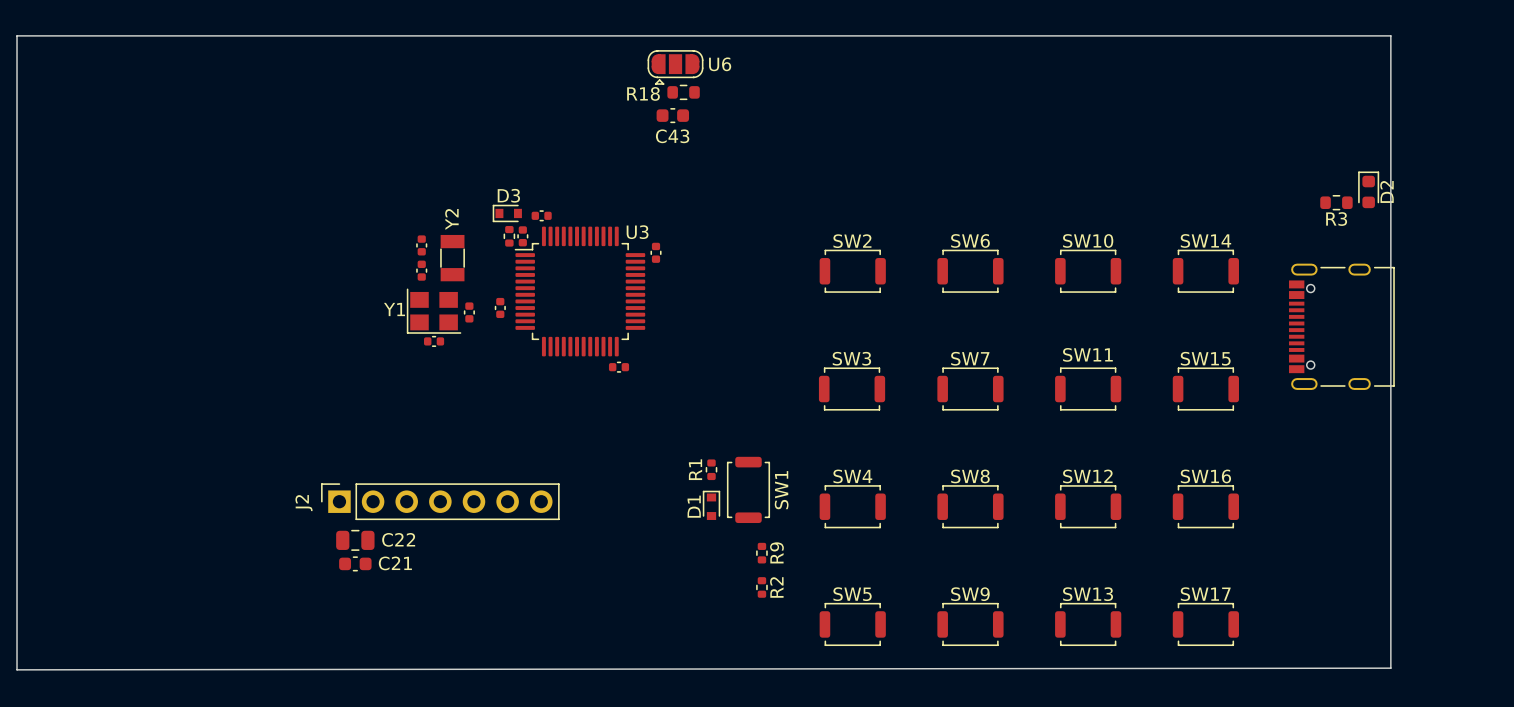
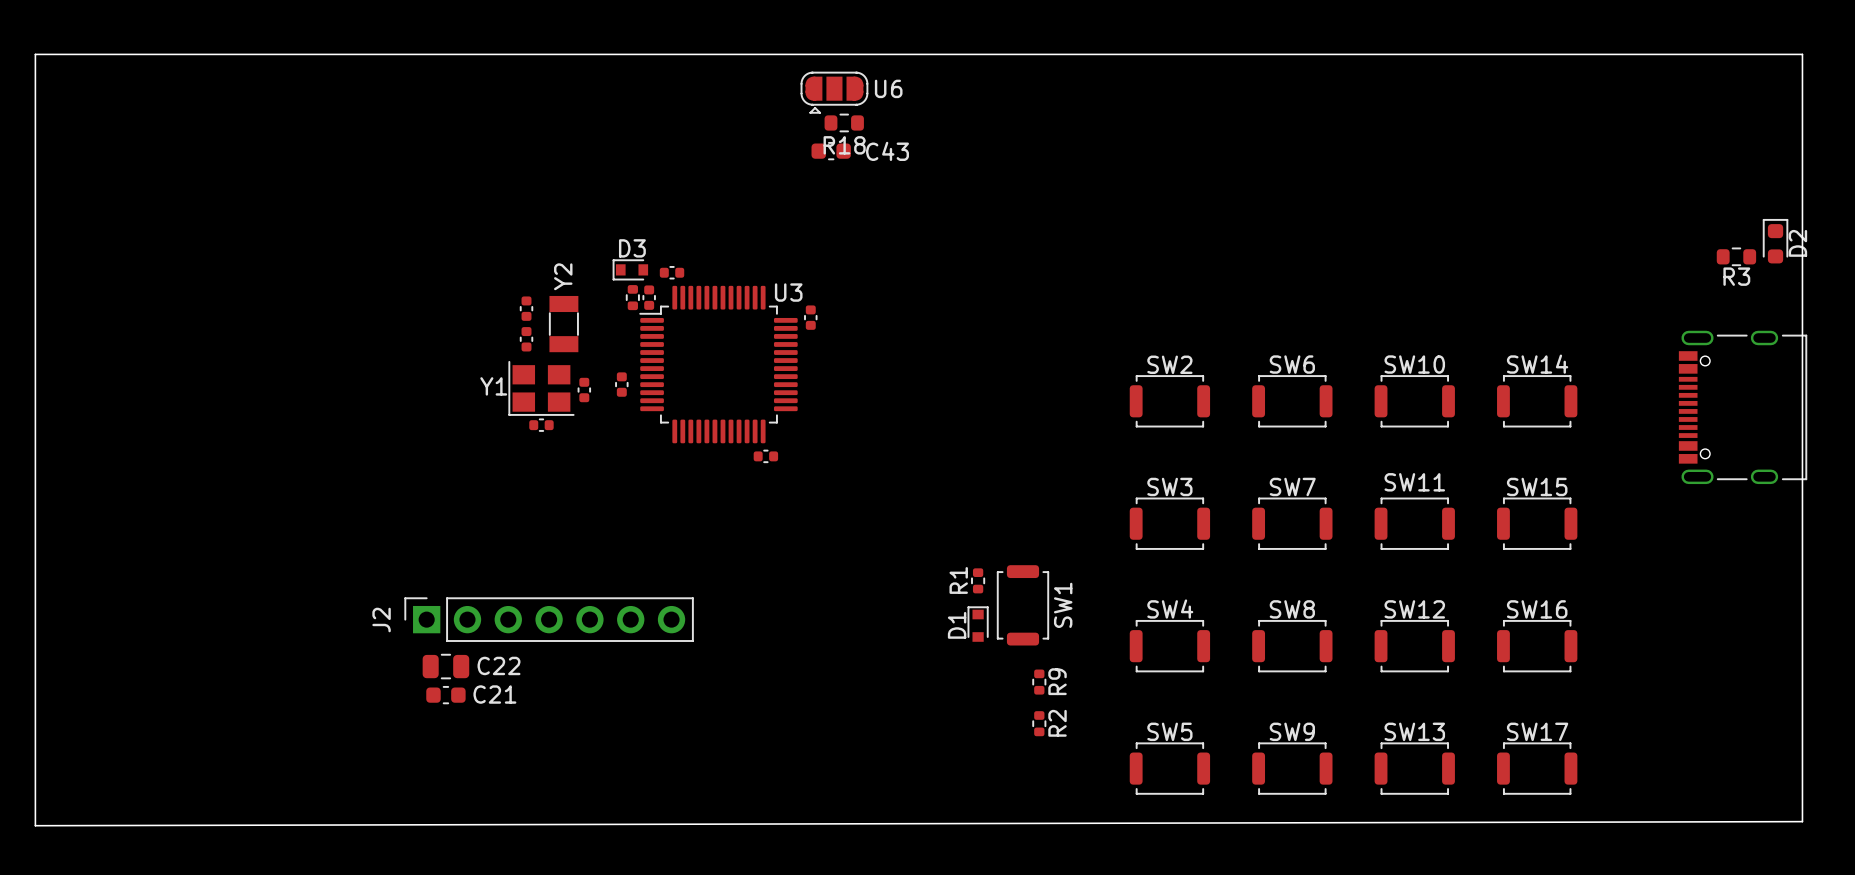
board edge: (1390, 35) (1390, 668) (17, 669) -> (1702, 54) (1802, 54) (1802, 821) (35, 825) (35, 823)
R18 name position: R18 (643, 93) -> R18 (844, 145)
C43 name position: C43 (672, 136) -> C43 (887, 151)
D2 position: (1368, 189) -> (1775, 241)
R3 position: (1336, 202) -> (1736, 256)
SW2 position: (852, 271) -> (1169, 401)
SW6 position: (970, 271) -> (1292, 401)
SW10 position: (1088, 271) -> (1414, 401)
SW14 position: (1205, 271) -> (1537, 401)
part position: (1341, 326) -> (1743, 407)
SW3 position: (852, 389) -> (1169, 523)
SW7 position: (970, 389) -> (1292, 523)
SW11 position: (1088, 389) -> (1414, 523)
SW15 position: (1205, 389) -> (1537, 523)
R1 position: (711, 469) -> (978, 580)
SW1 position: (748, 489) -> (1022, 605)
D1 position: (711, 505) -> (978, 624)
SW4 position: (852, 506) -> (1169, 646)
SW8 position: (970, 506) -> (1292, 646)
SW12 position: (1088, 506) -> (1414, 646)
SW16 position: (1205, 506) -> (1537, 646)
R9 position: (761, 553) -> (1039, 682)
R2 position: (761, 587) -> (1039, 723)
SW5 position: (852, 624) -> (1169, 768)
SW9 position: (970, 624) -> (1292, 768)
SW13 position: (1088, 624) -> (1414, 768)
SW17 position: (1205, 624) -> (1537, 768)

